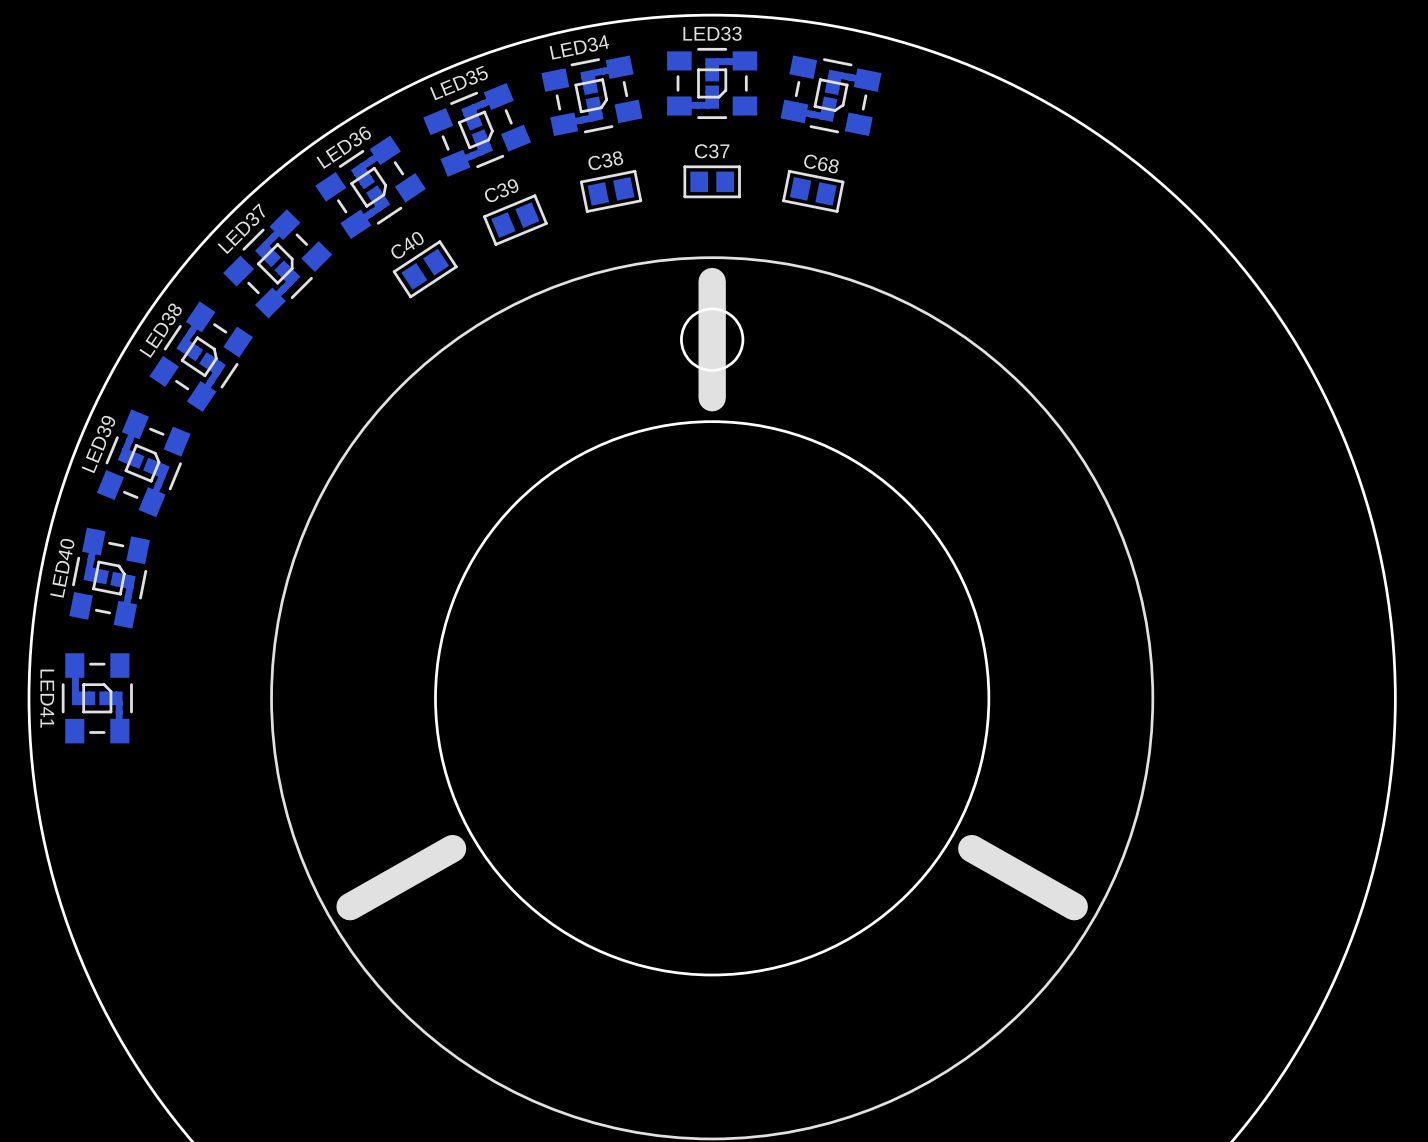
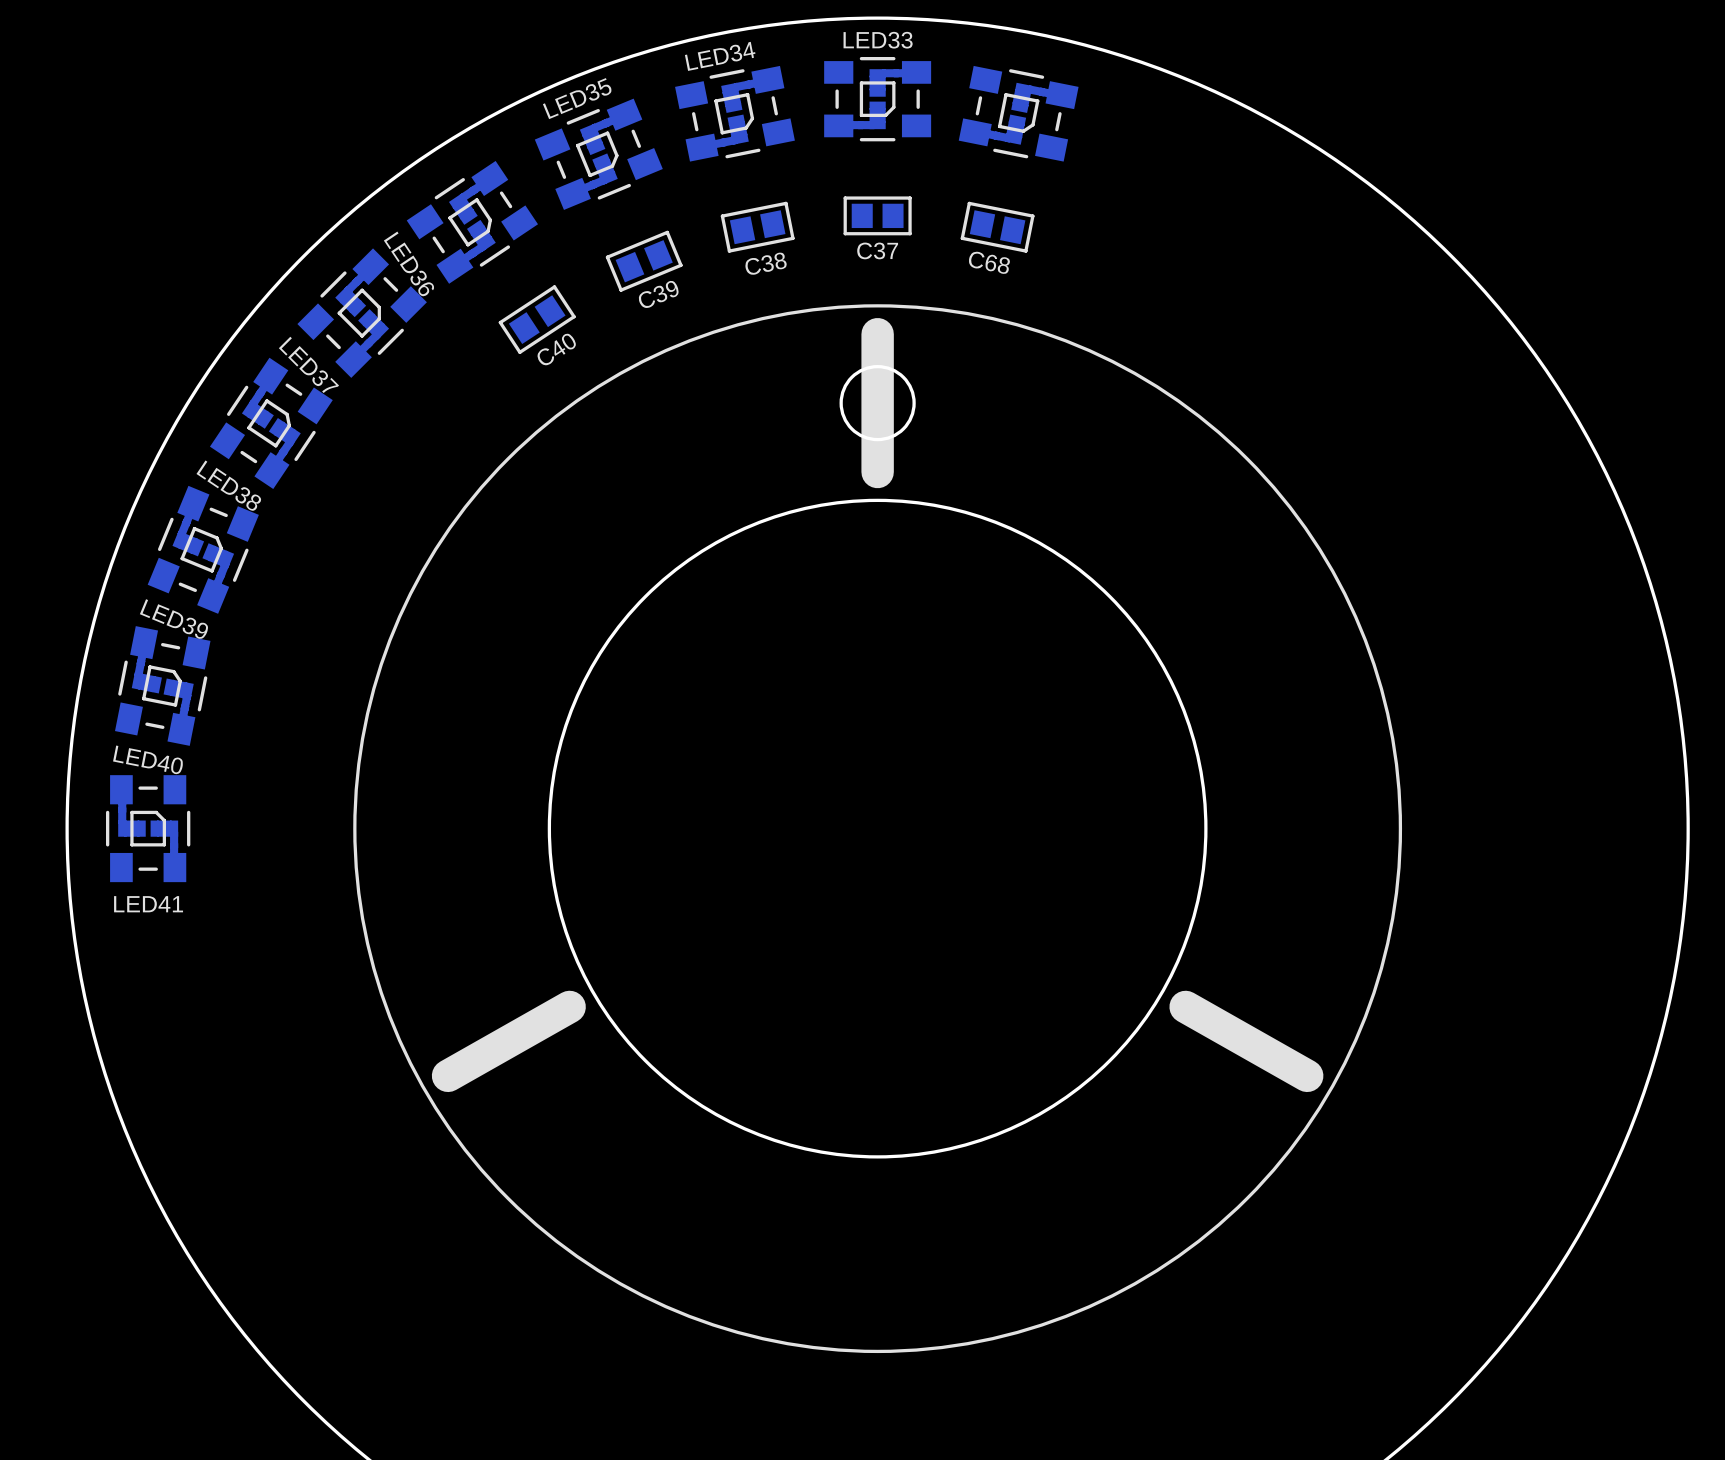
LED36 name rotation: 0° (343, 147) -> 90° clockwise (409, 264)
LED36 name position: LED36 (343, 147) -> LED36 (409, 264)
C37 name position: C37 (712, 151) -> C37 (877, 250)
C38 name position: C38 (605, 160) -> C38 (765, 263)
C68 name position: C68 (821, 163) -> C68 (989, 262)
C39 name position: C39 (501, 190) -> C39 (658, 294)
LED37 name rotation: 0° (241, 228) -> 90° clockwise (308, 364)
LED37 name position: LED37 (241, 228) -> LED37 (308, 364)
C40 name position: C40 (407, 245) -> C40 (556, 349)
LED38 name rotation: 0° (160, 330) -> 90° clockwise (228, 485)
LED38 name position: LED38 (160, 330) -> LED38 (228, 485)
LED39 name rotation: 0° (98, 444) -> 90° clockwise (174, 619)
LED39 name position: LED39 (98, 444) -> LED39 (174, 619)
LED40 name rotation: 0° (62, 568) -> 90° clockwise (148, 760)
LED40 name position: LED40 (62, 568) -> LED40 (148, 760)
LED41 name rotation: 0° (47, 698) -> 90° counterclockwise (148, 904)
LED41 name position: LED41 (47, 698) -> LED41 (148, 904)

